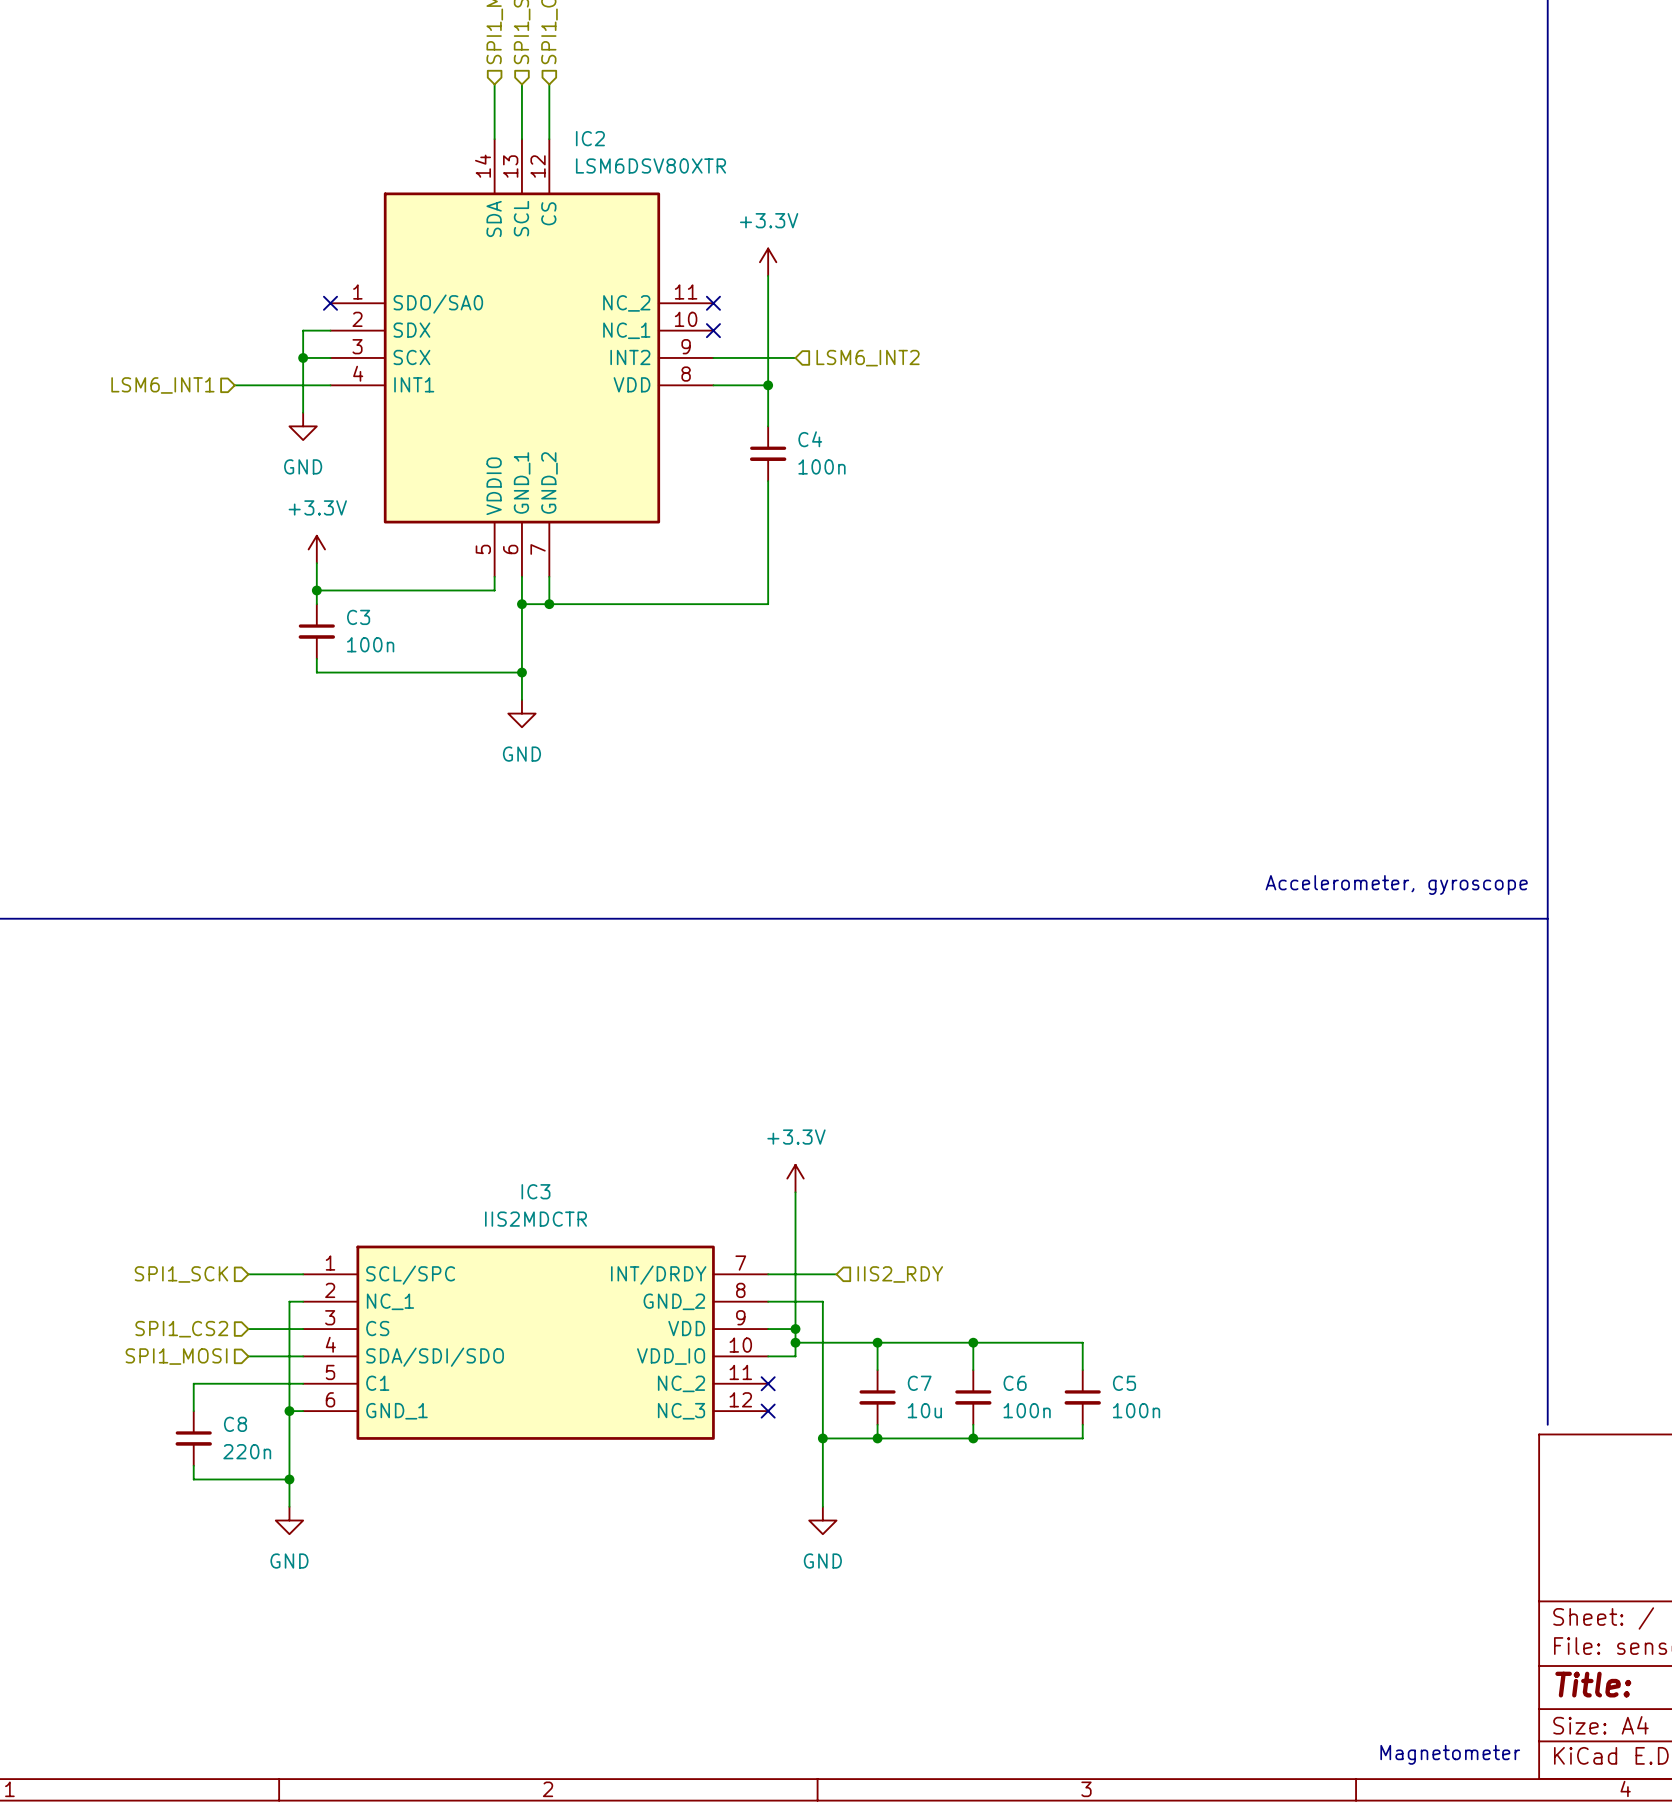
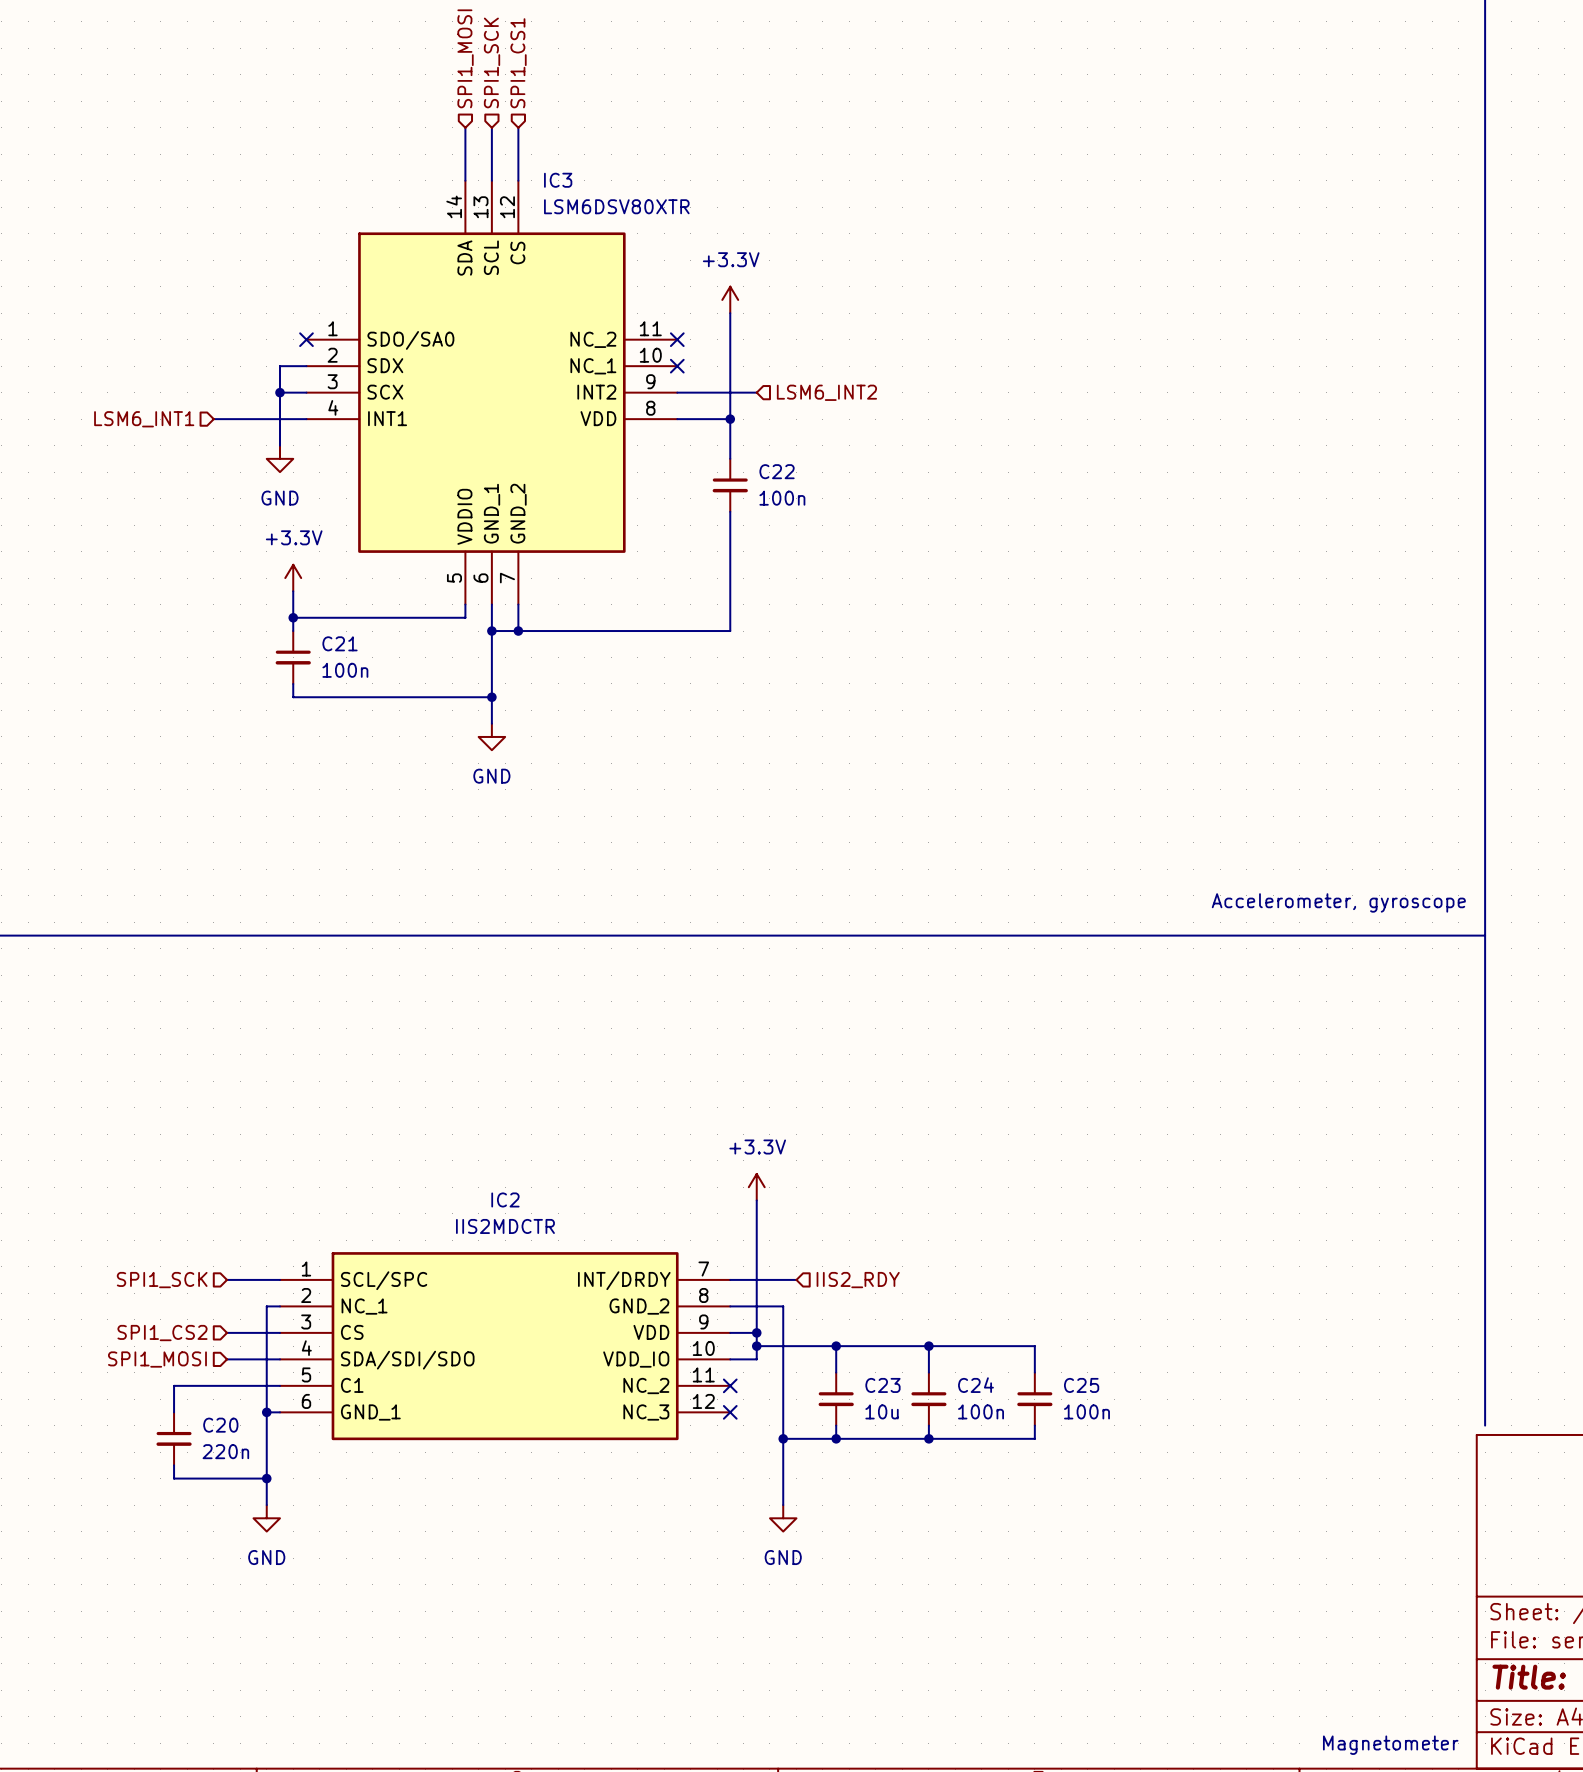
IC2 name: IC2 (590, 138) -> IC3 (558, 180)
C4 name: C4 (810, 439) -> C22 (777, 471)
C3 name: C3 (358, 617) -> C21 (340, 643)
IC3 name: IC3 (535, 1191) -> IC2 (505, 1199)
C7 name: C7 (919, 1383) -> C23 (882, 1385)
C6 name: C6 (1015, 1383) -> C24 (975, 1385)
C5 name: C5 (1124, 1383) -> C25 (1081, 1385)
C8 name: C8 (235, 1424) -> C20 (220, 1425)

